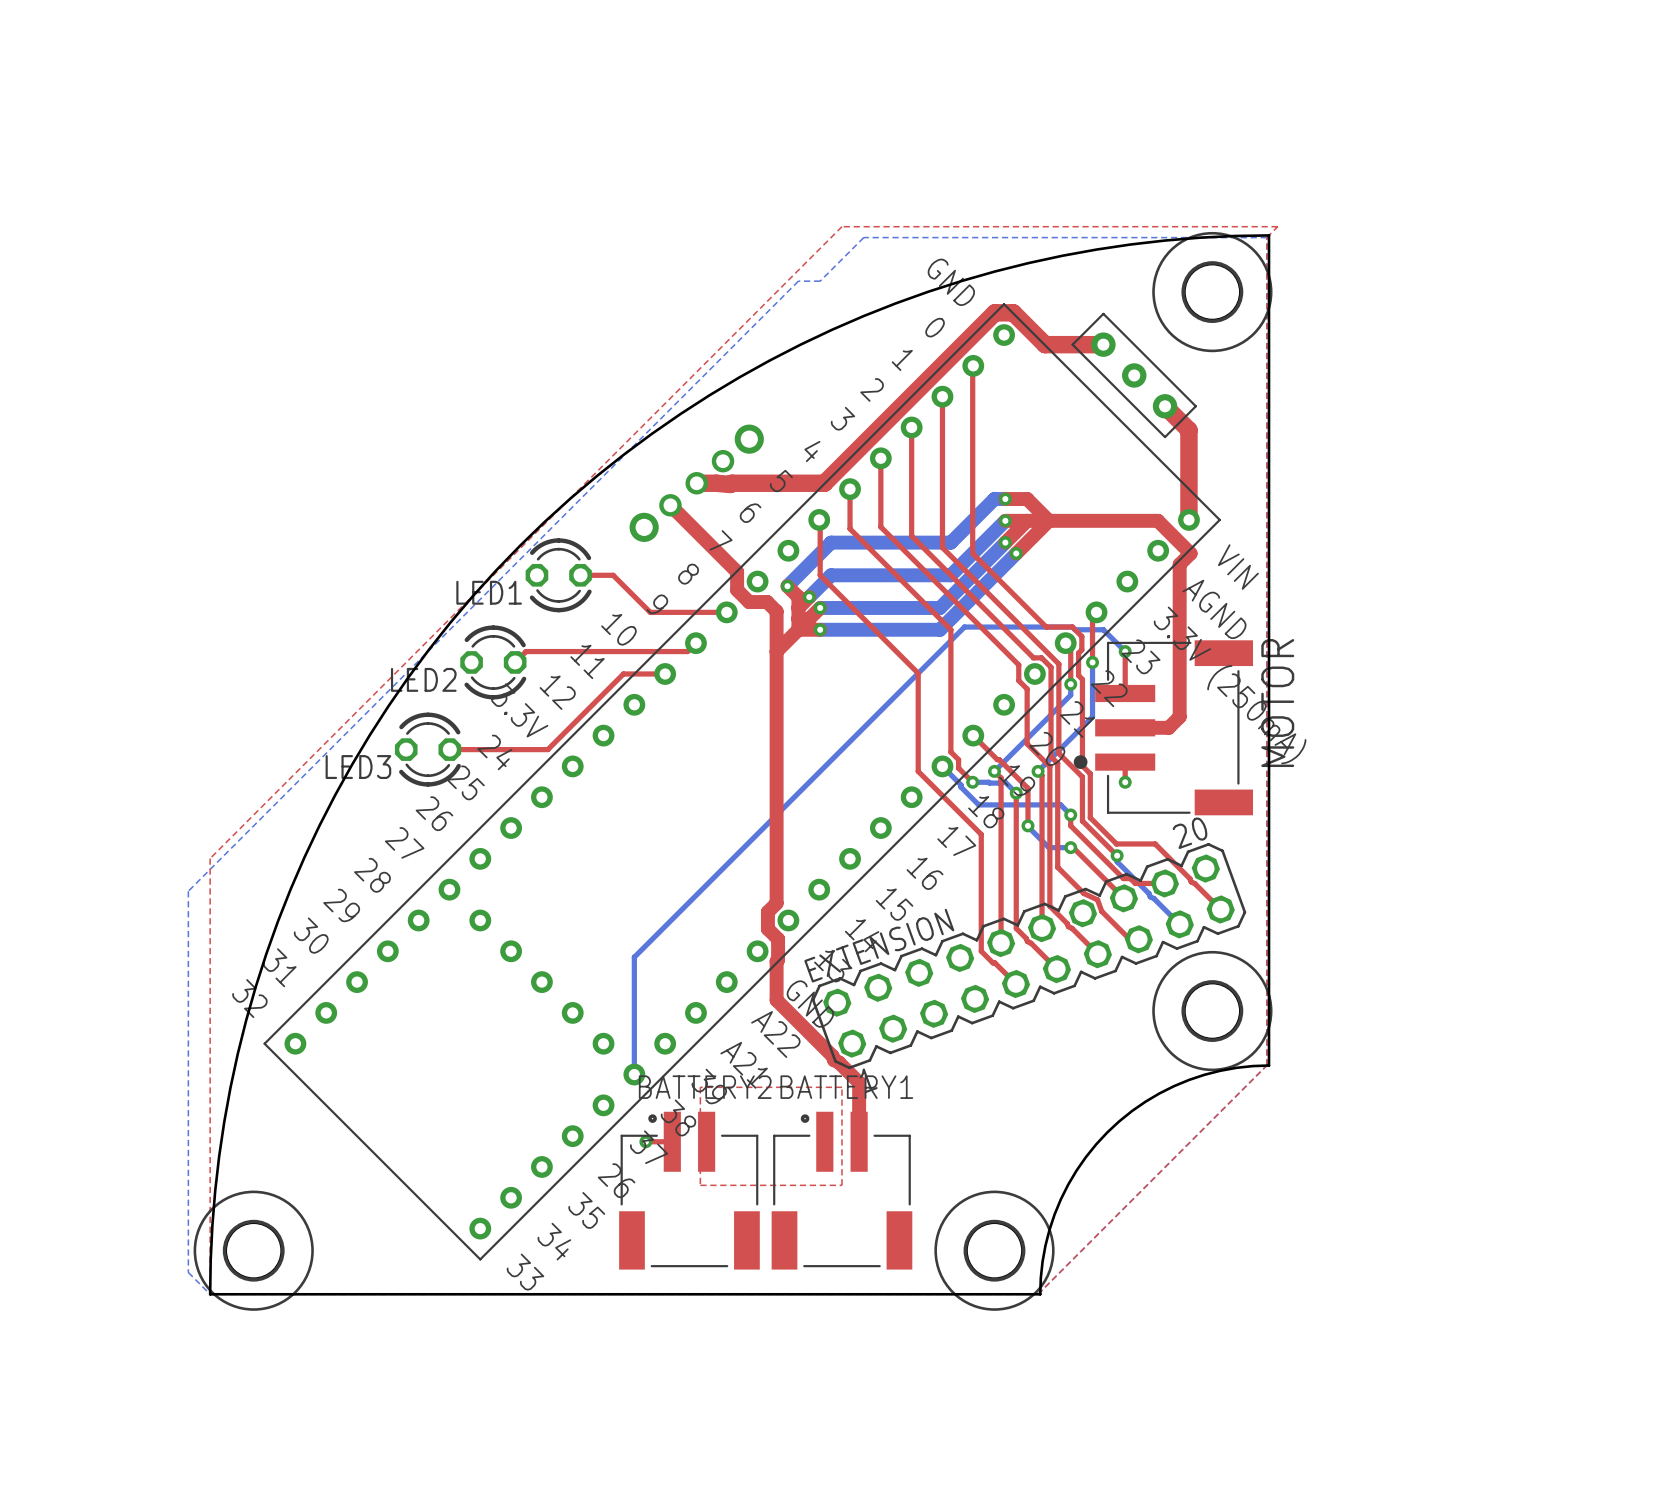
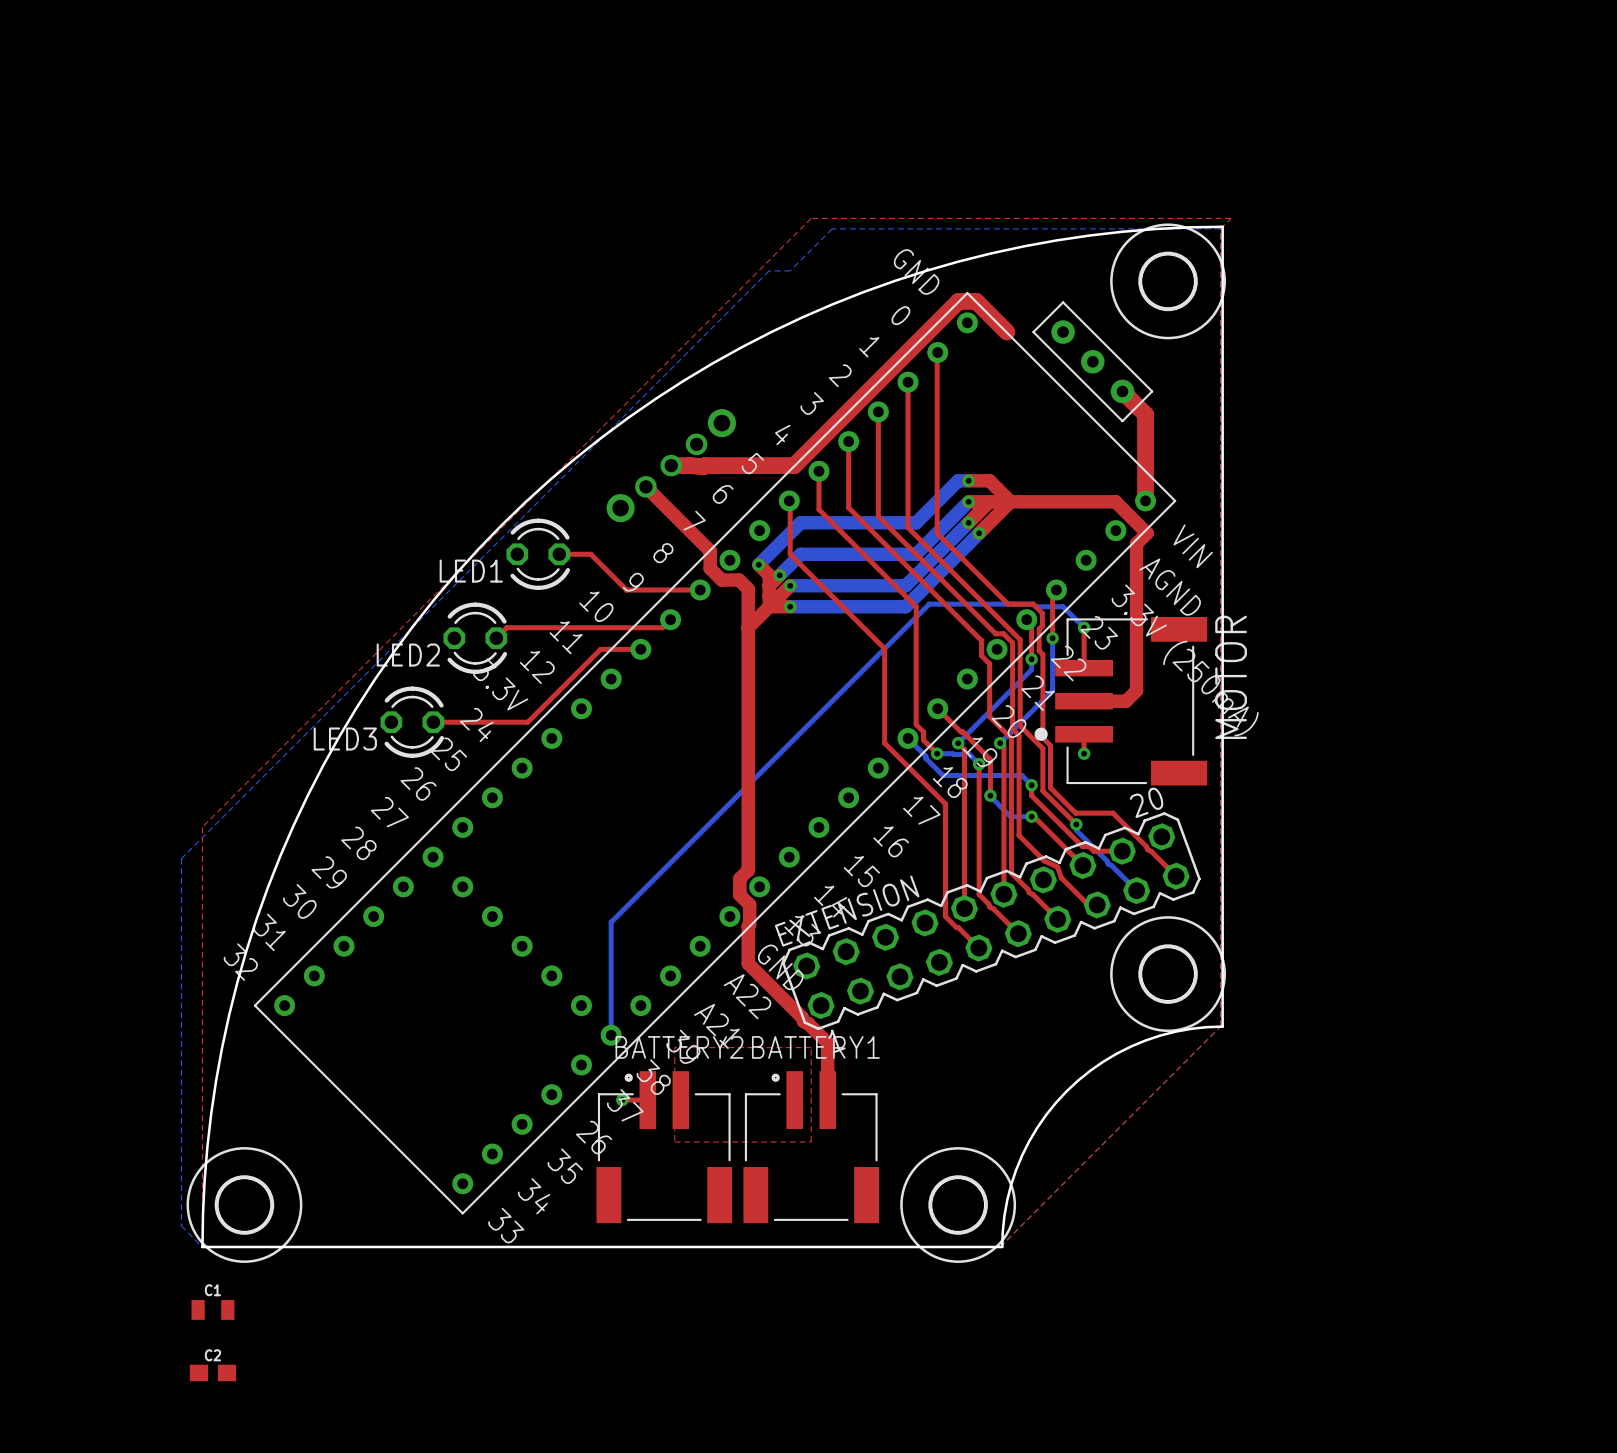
top track: (1045, 344) (1103, 344) -> none
C1: none -> (212, 1309)
C2: none -> (212, 1372)

